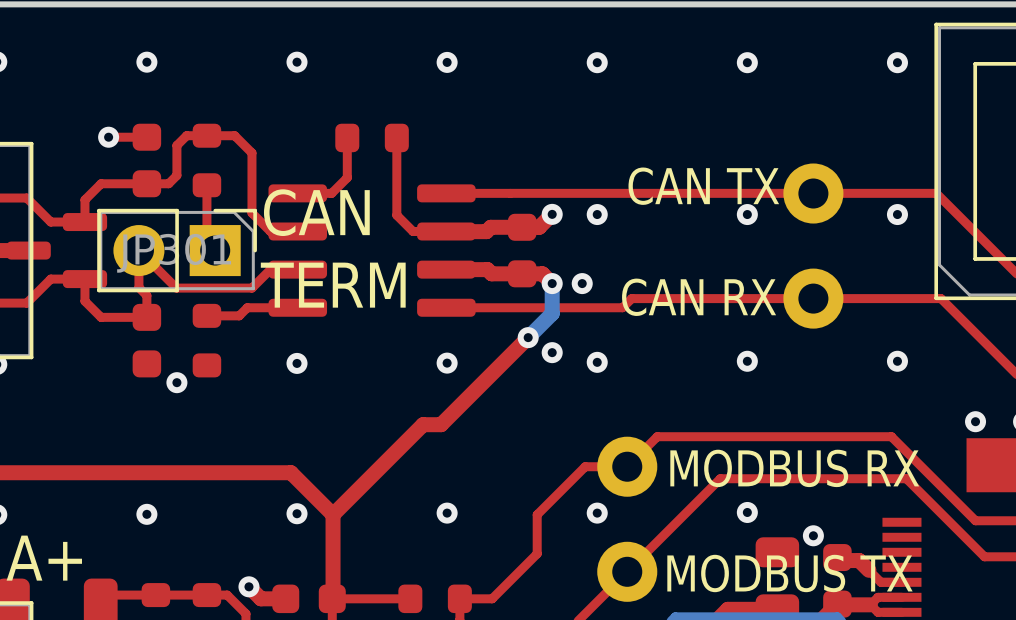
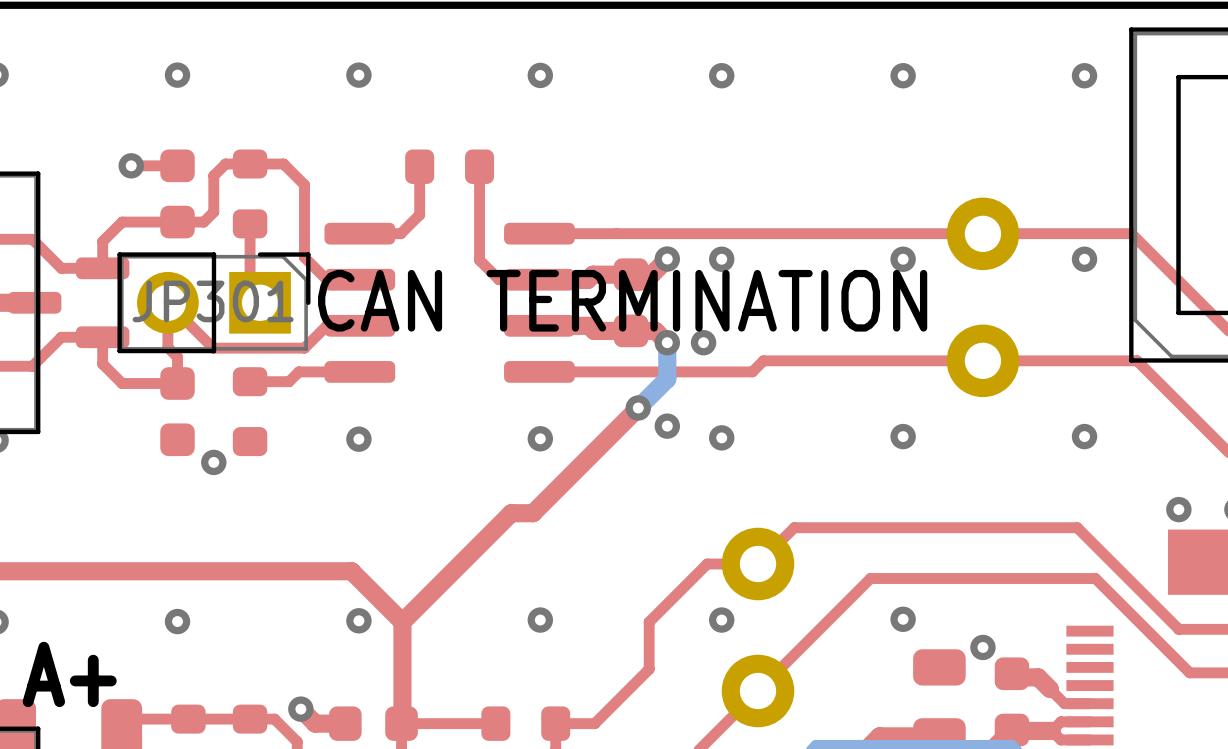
text: CAN TX (703, 186) -> none
text: CAN (316, 212) -> none
text: none -> CAN TERMINATION (622, 300)
text: TERM (333, 285) -> none
text: CAN RX (699, 297) -> none
text: MODBUS RX (794, 468) -> none
text: MODBUS TX (789, 573) -> none

